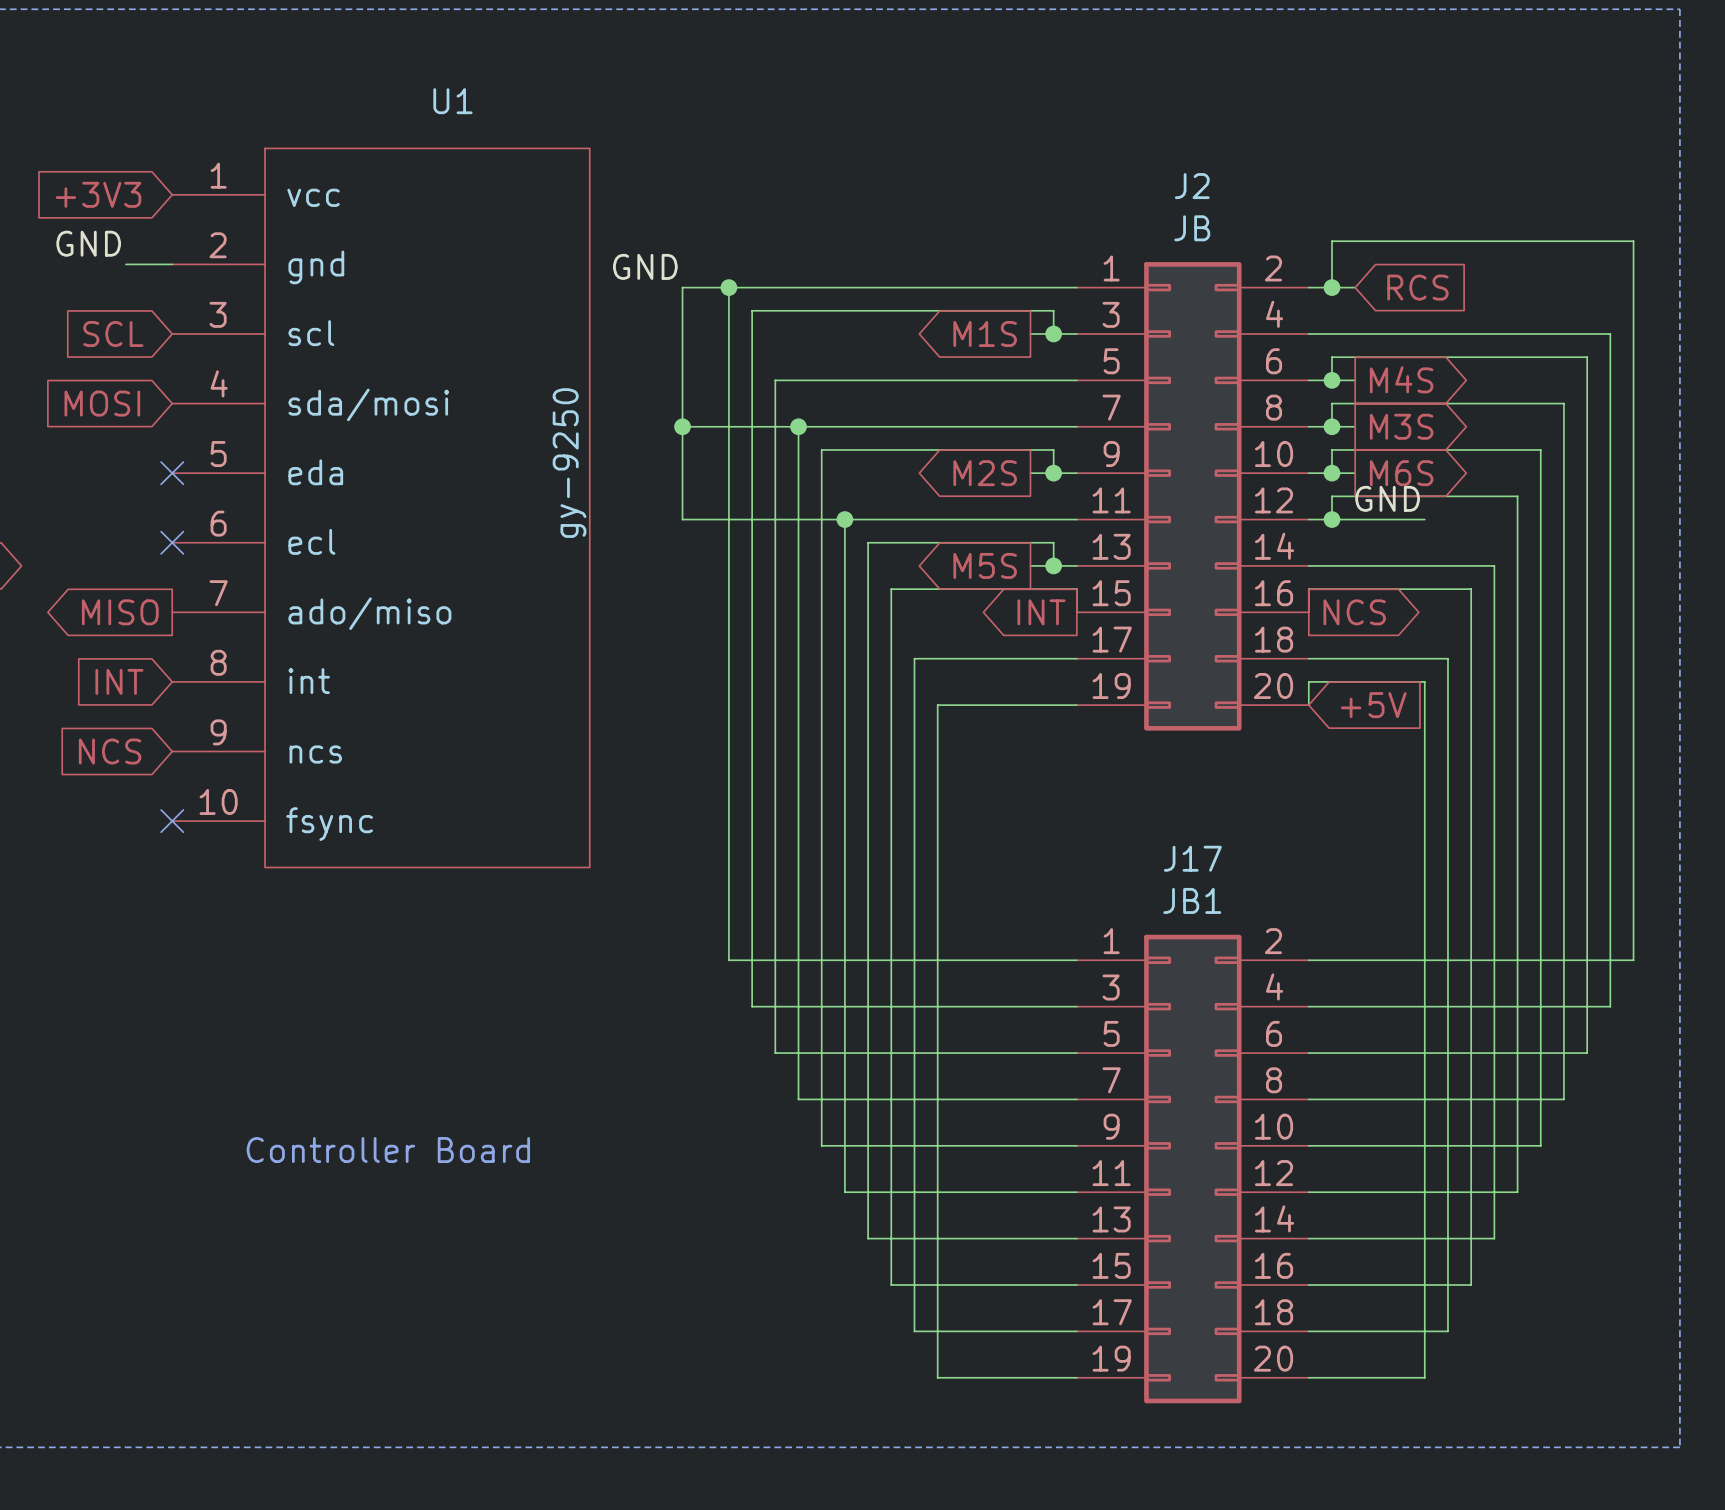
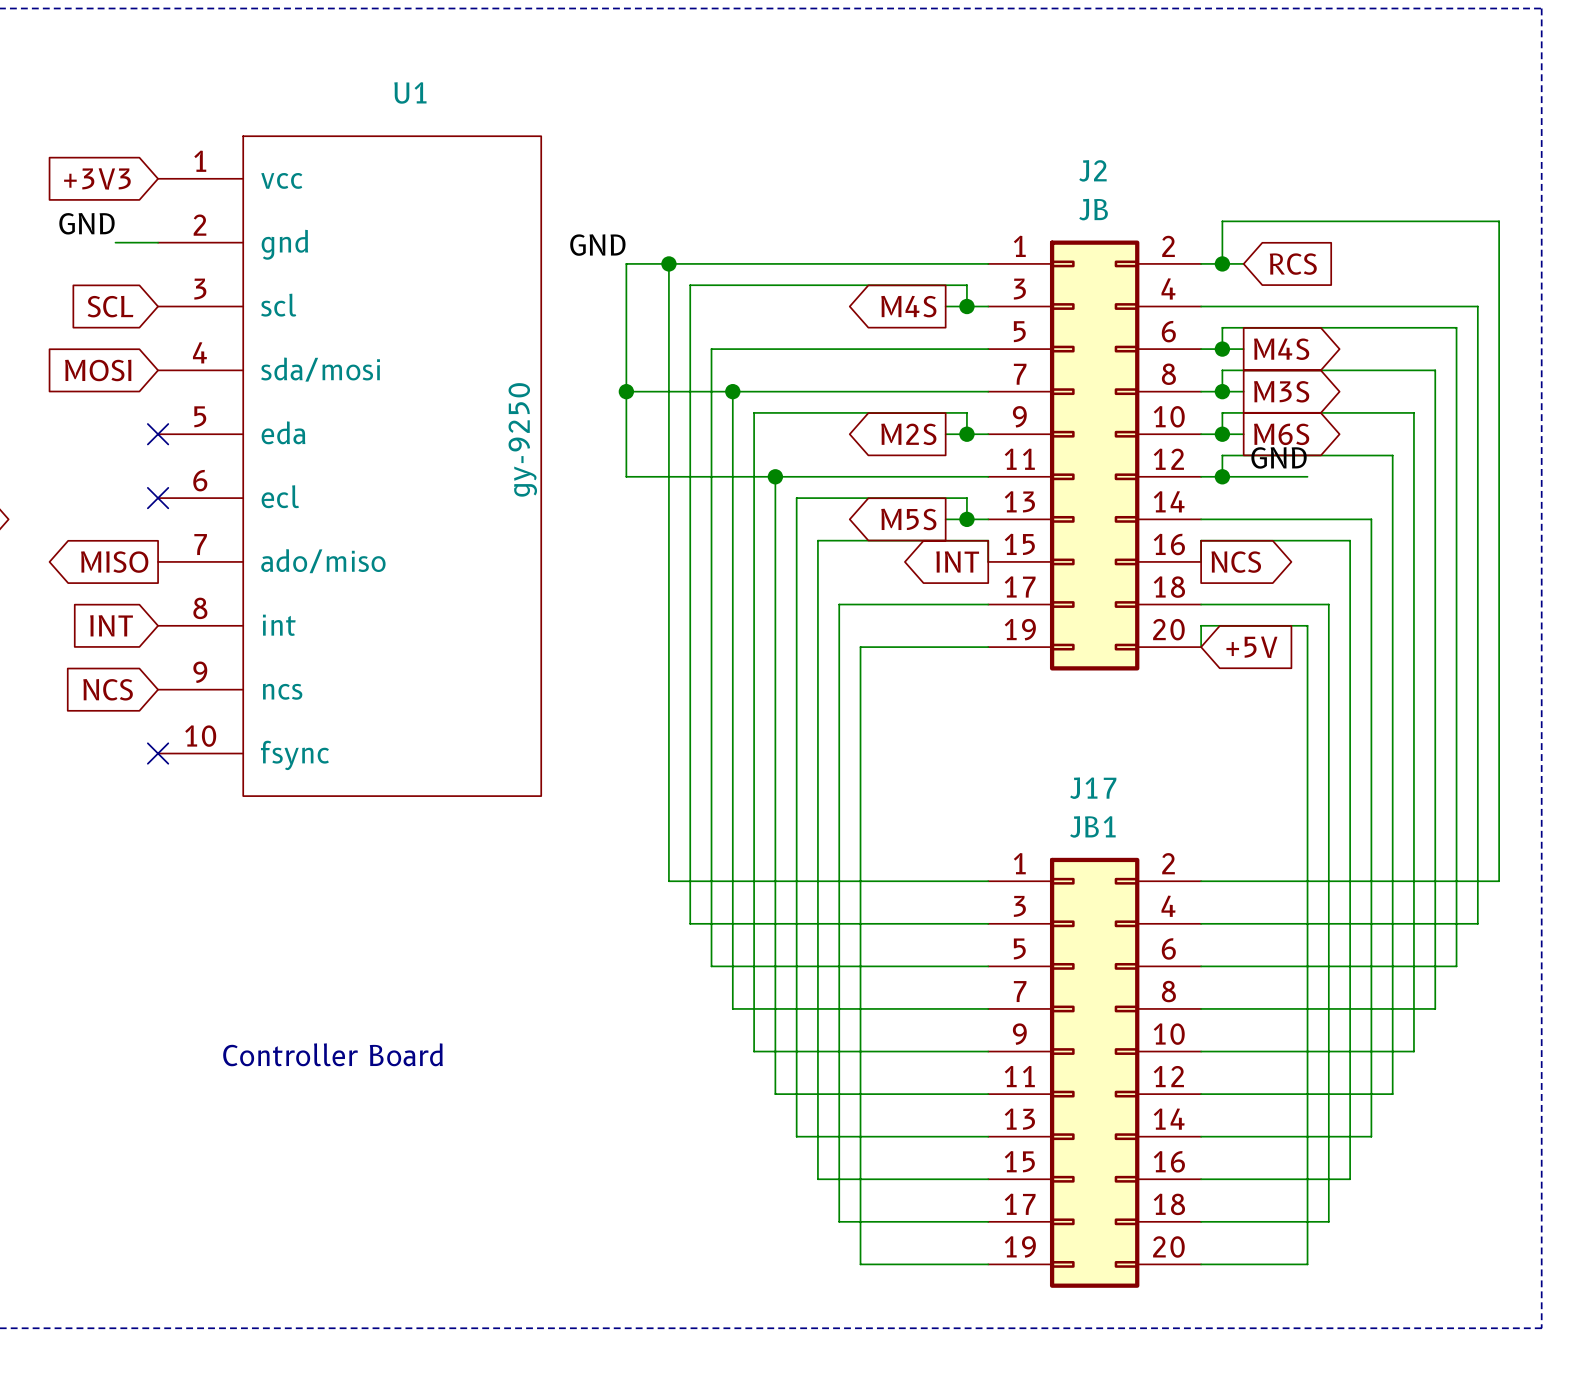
global label: M1S (985, 333) -> M4S (908, 306)

